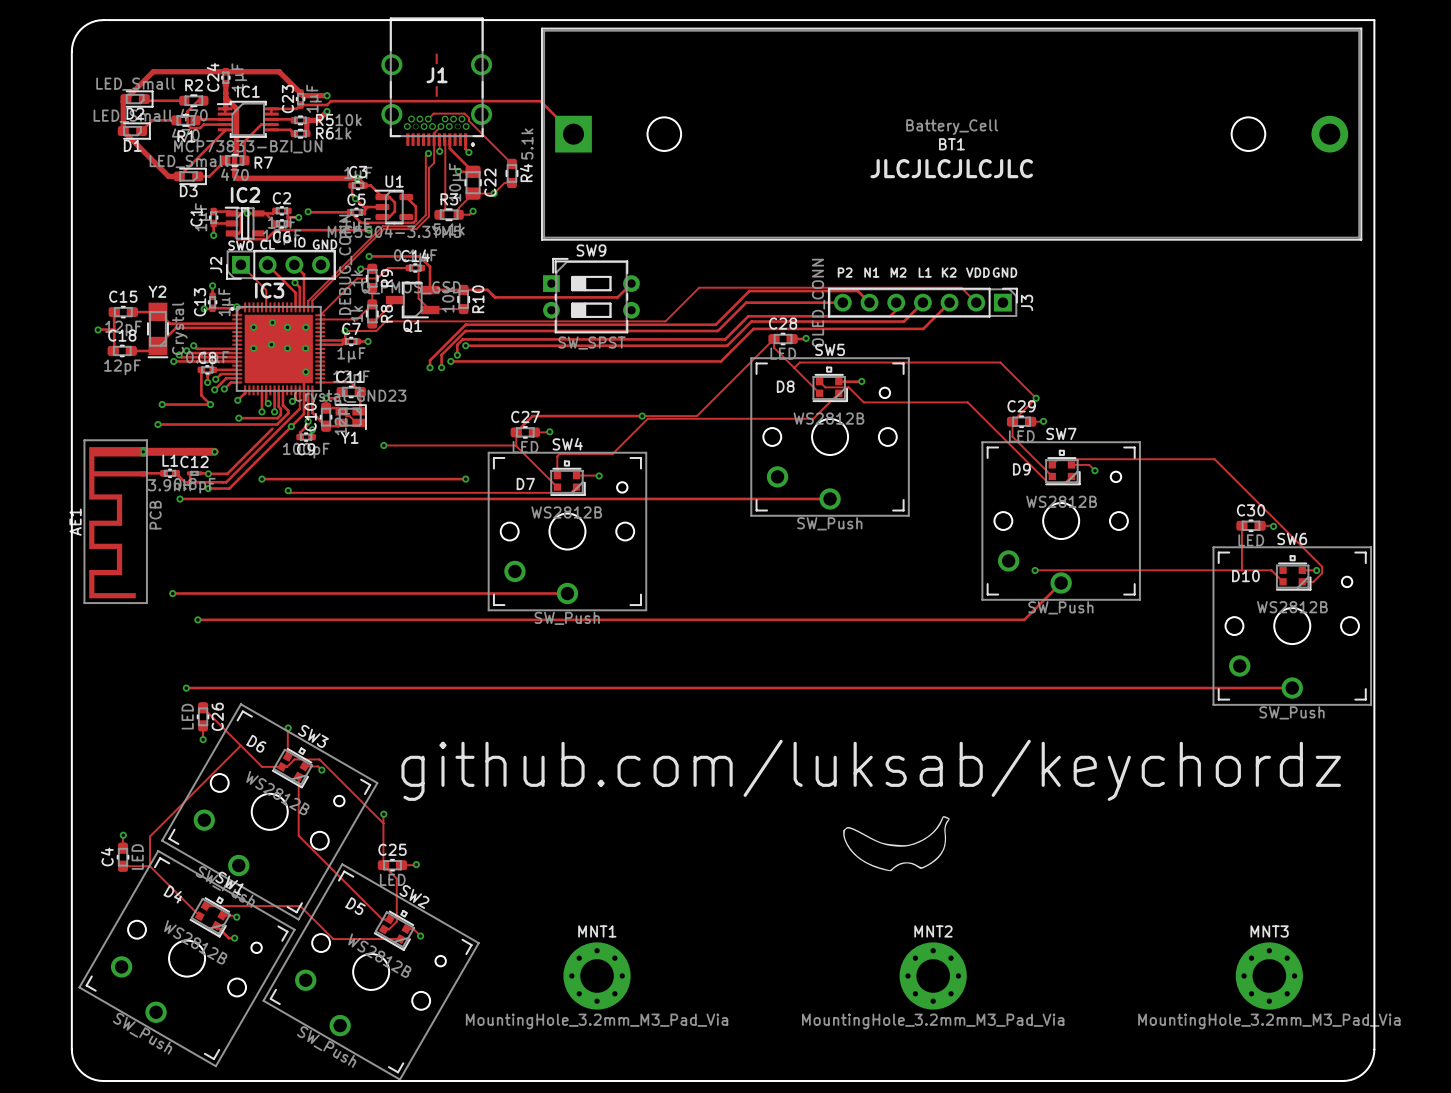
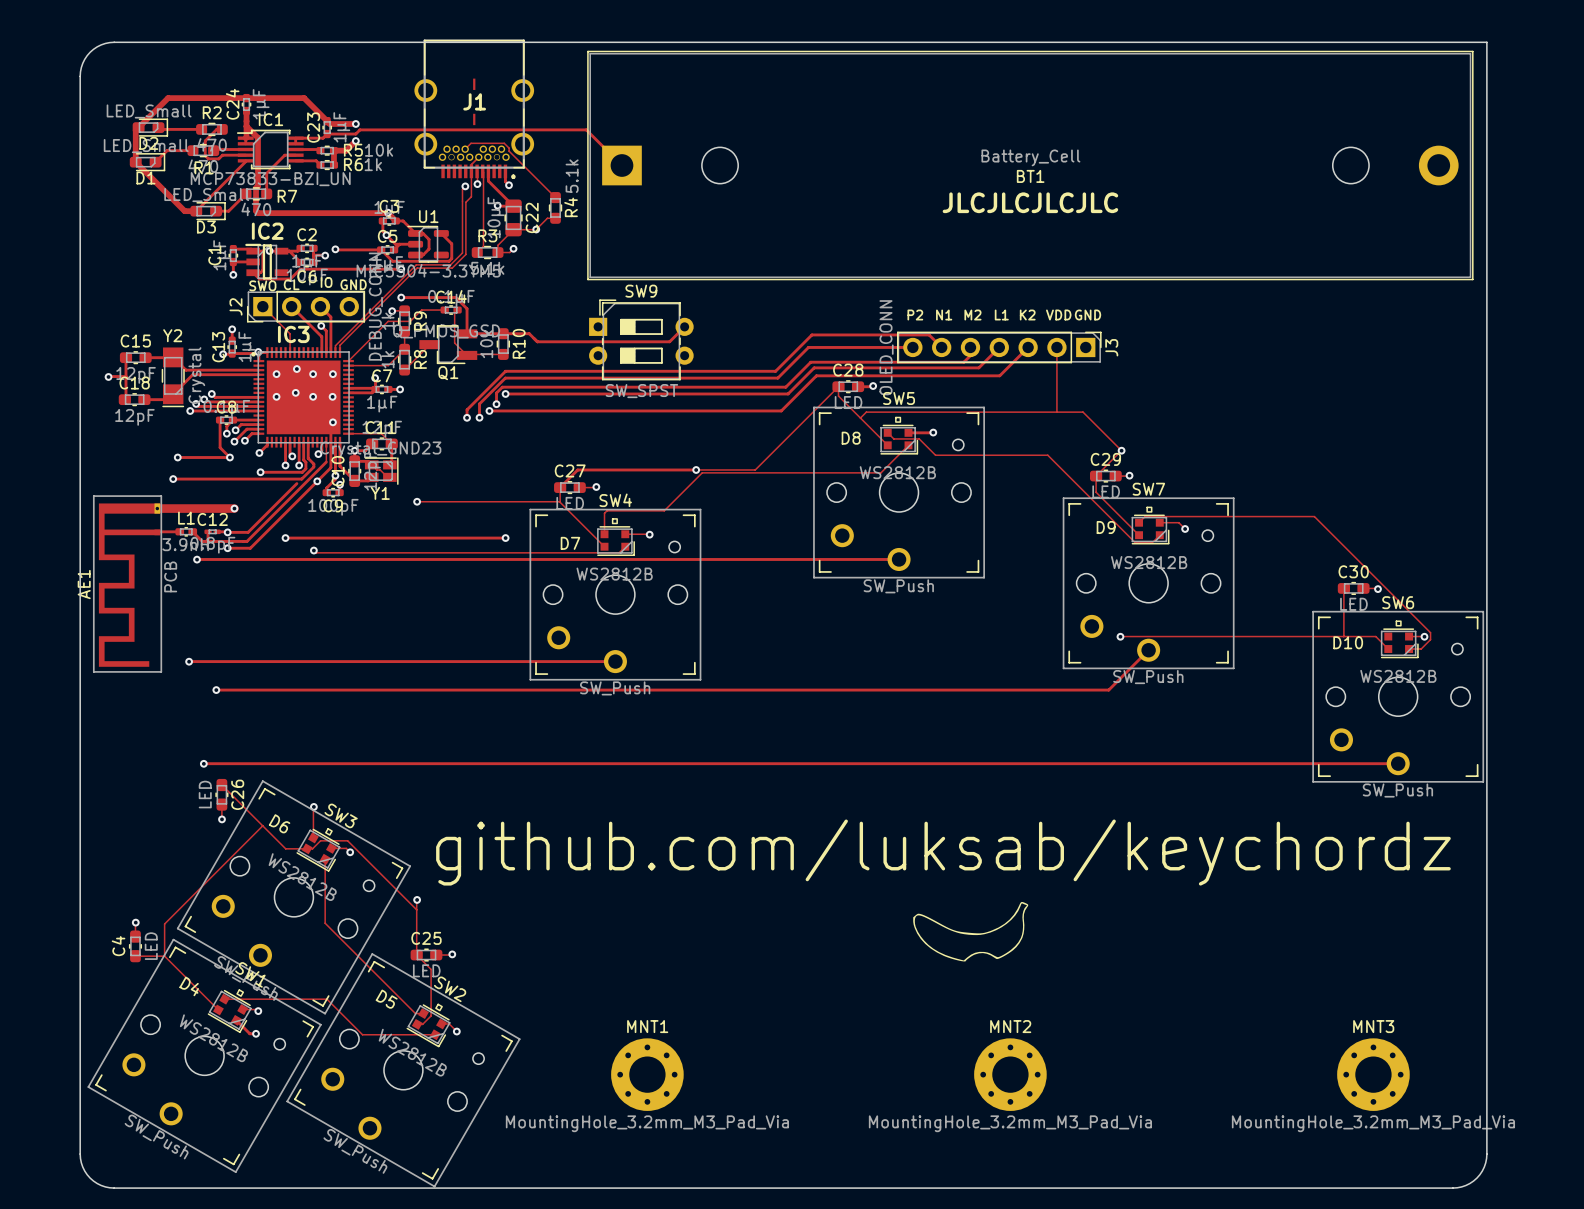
track: (976, 302) (961, 287) (699, 287) (665, 321) (385, 321) (376, 331) (344, 331) -> (1056, 347) (1056, 412)

